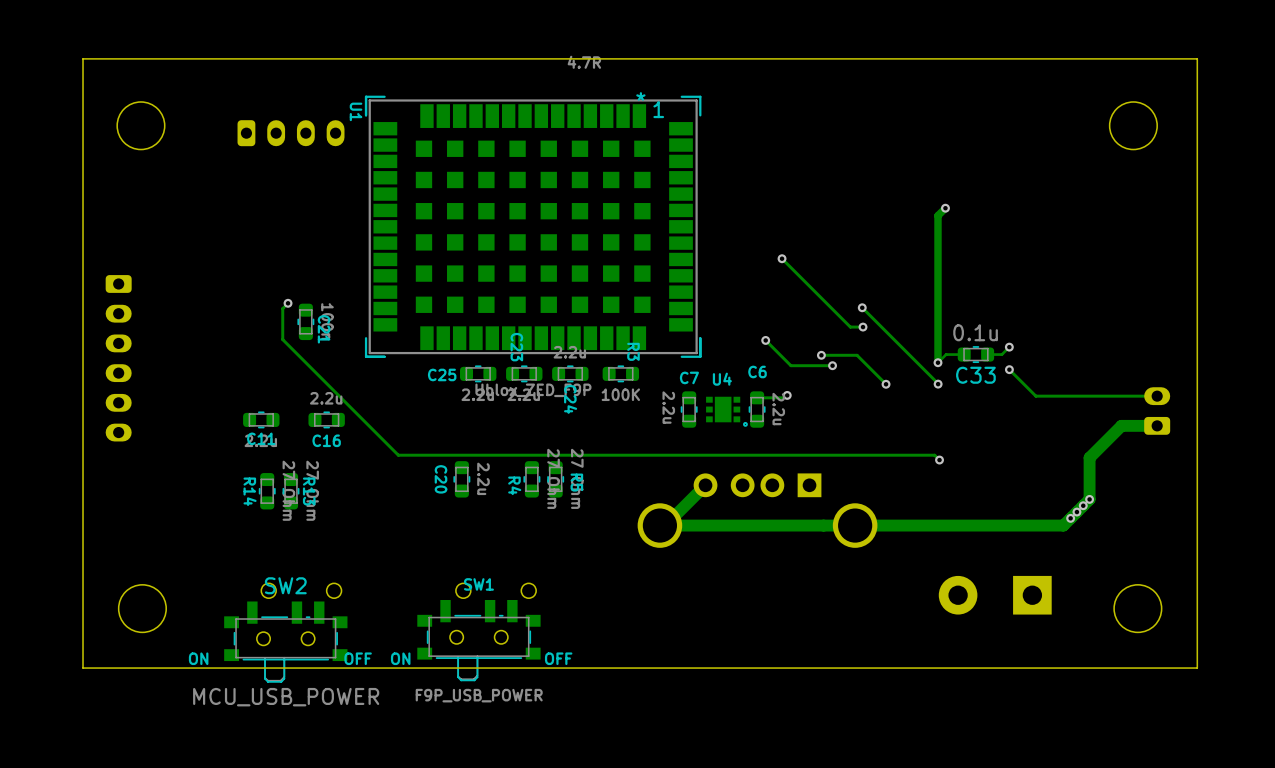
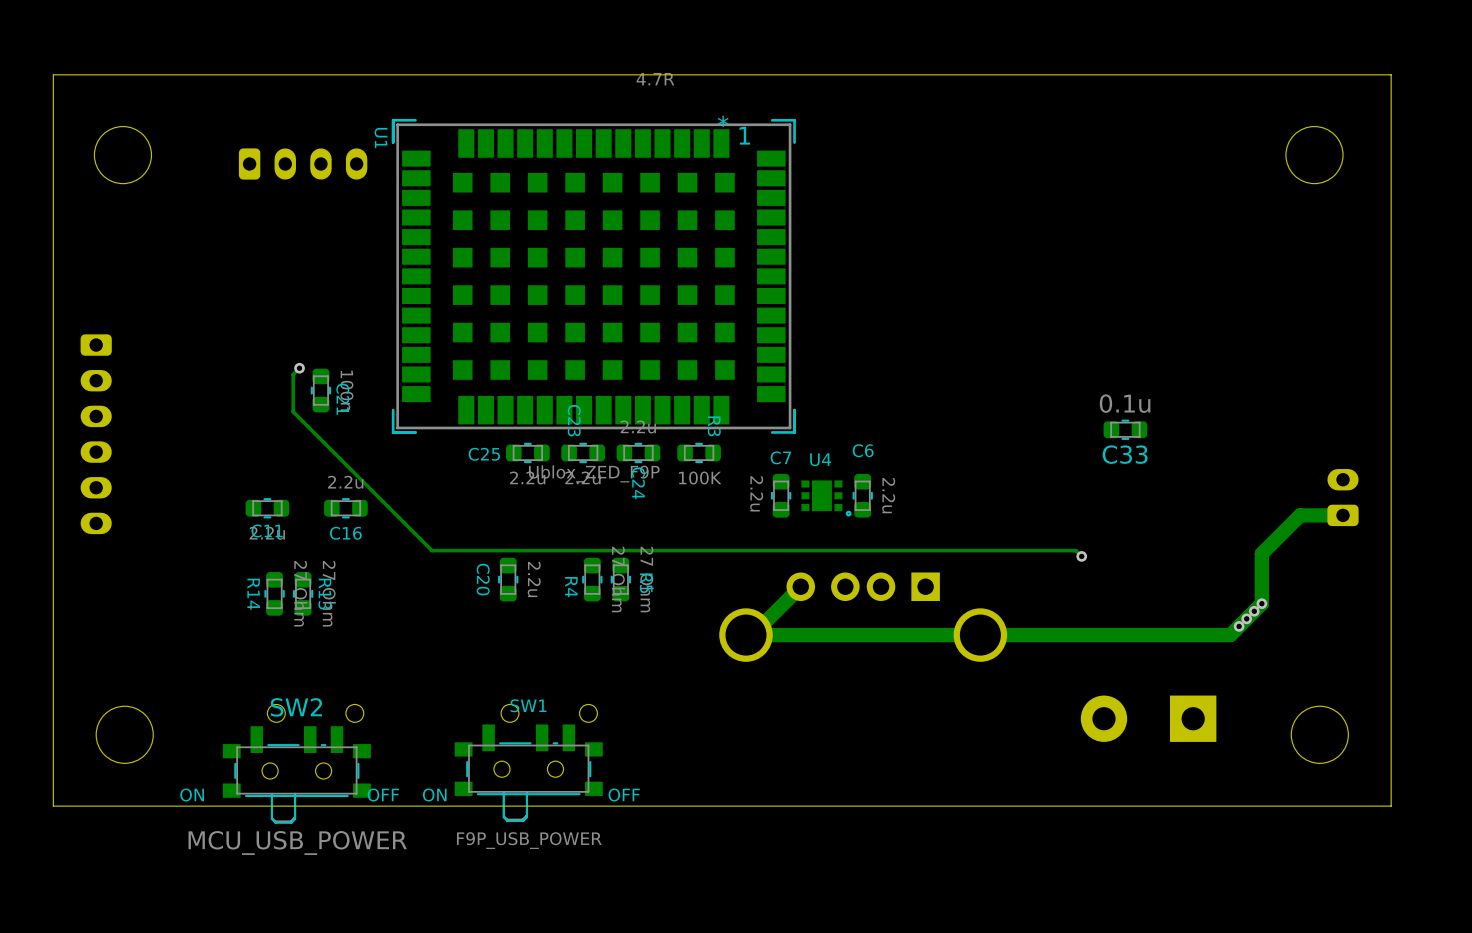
track: (945, 208) (937, 215) (937, 362) (946, 354) (964, 354) -> none
via: (945, 208) -> none
track: (782, 258) (850, 327) (863, 327) -> none
via: (782, 258) -> none
track: (862, 307) (938, 384) -> none
via: (862, 307) -> none
via: (863, 327) -> none
track: (765, 340) (790, 365) (832, 365) -> none
via: (765, 340) -> none
track: (1009, 347) (1001, 354) (987, 354) -> none
via: (1009, 347) -> none
track: (821, 355) (857, 355) (886, 384) -> none
via: (821, 355) -> none
via: (937, 362) -> none
via: (832, 365) -> none
track: (1009, 369) (1035, 396) (1157, 396) -> none
via: (1009, 369) -> none
via: (886, 384) -> none
via: (938, 384) -> none
track: (787, 395) (784, 397) (757, 397) -> none
via: (787, 395) -> none

